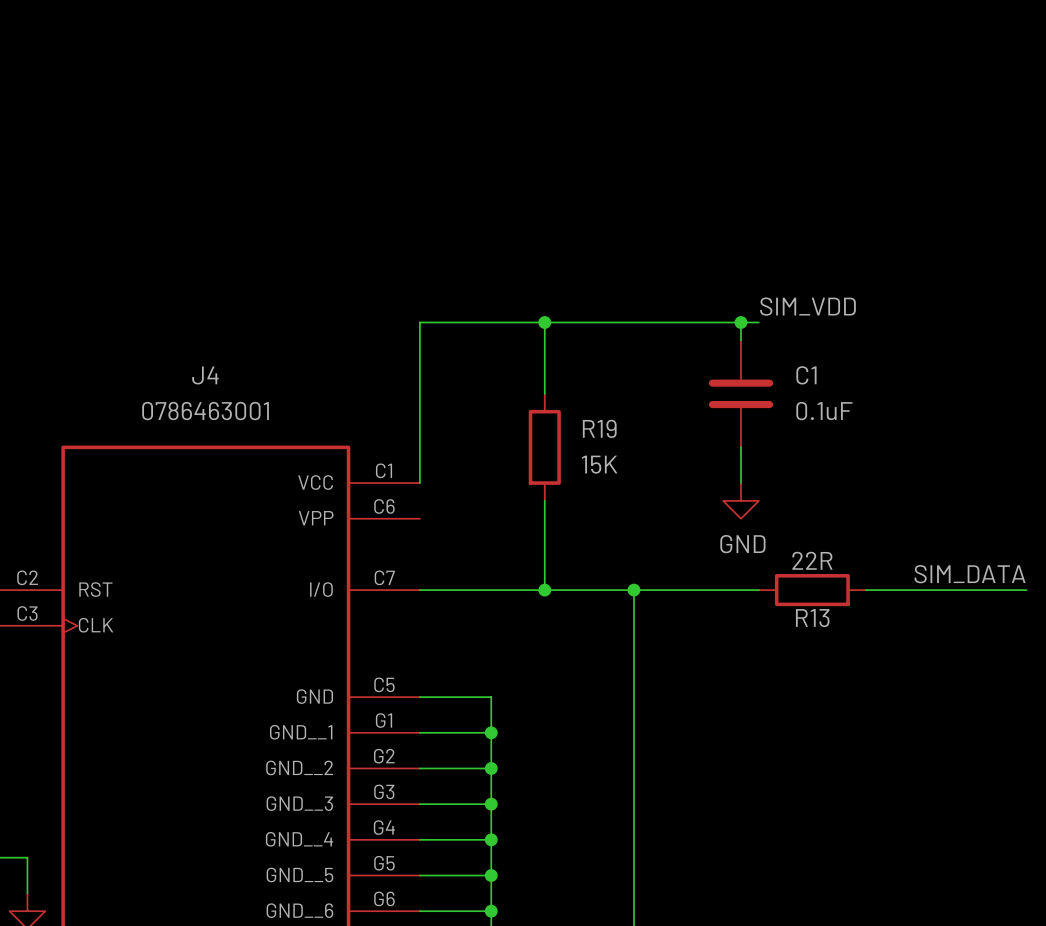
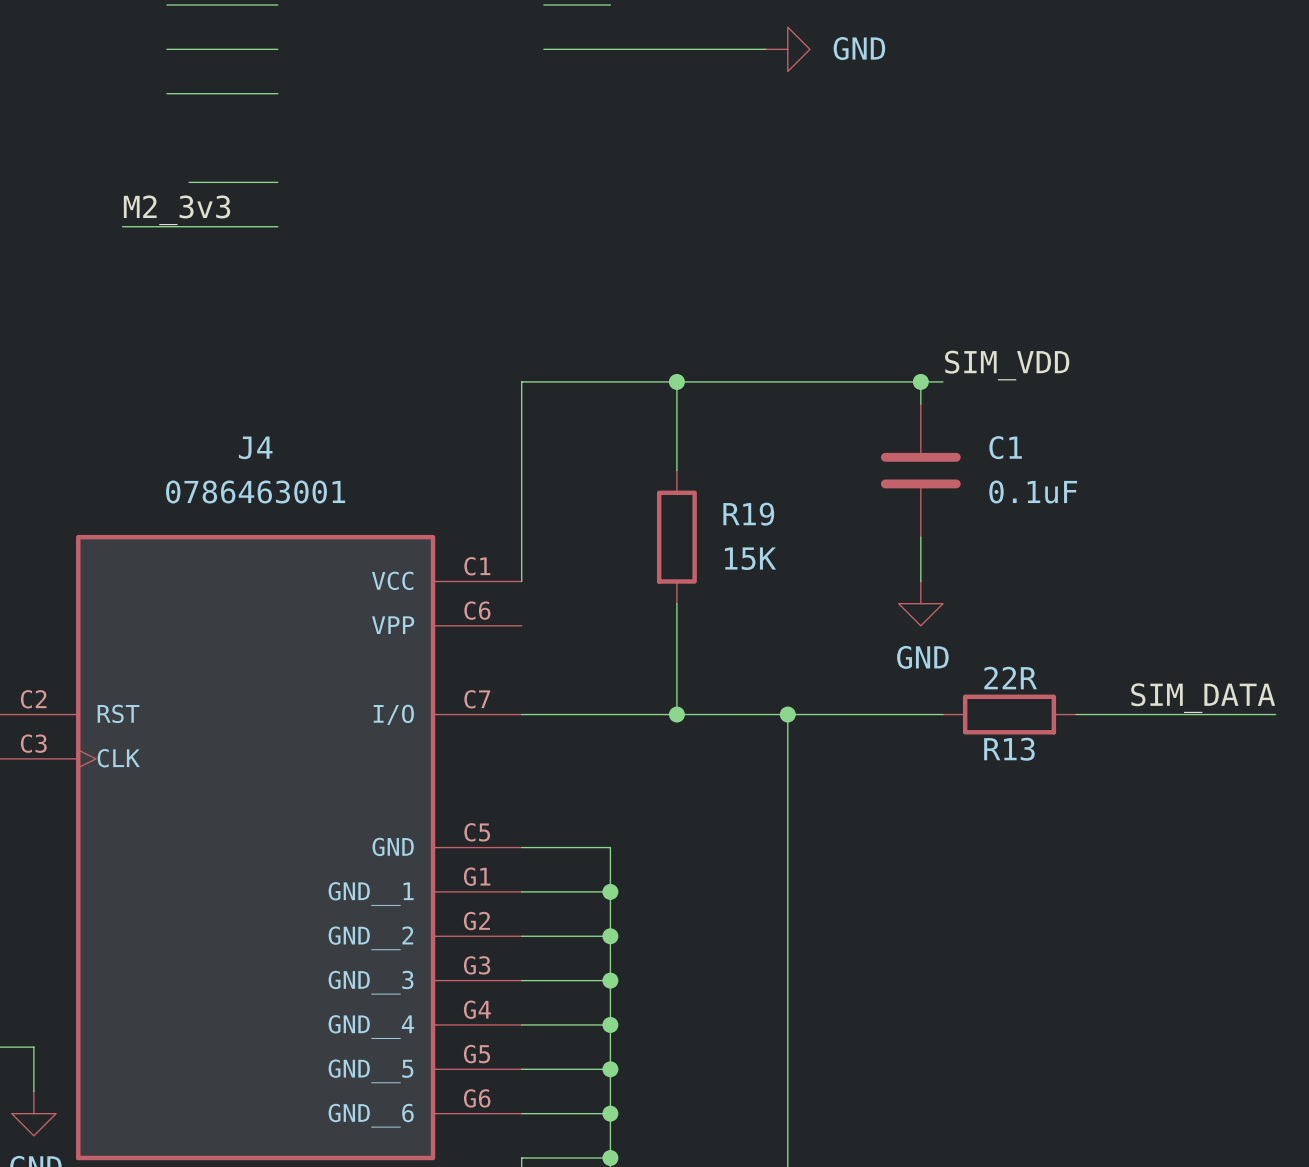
wire: none -> (166, 4) (277, 4)
wire: none -> (543, 4) (610, 4)
wire: none -> (166, 49) (277, 49)
wire: none -> (543, 49) (765, 49)
power symbol: none -> GND (787, 49)
wire: none -> (166, 93) (277, 93)
wire: none -> (189, 182) (277, 182)
label: none -> M2_3v3 (177, 210)
wire: none -> (122, 226) (277, 226)

